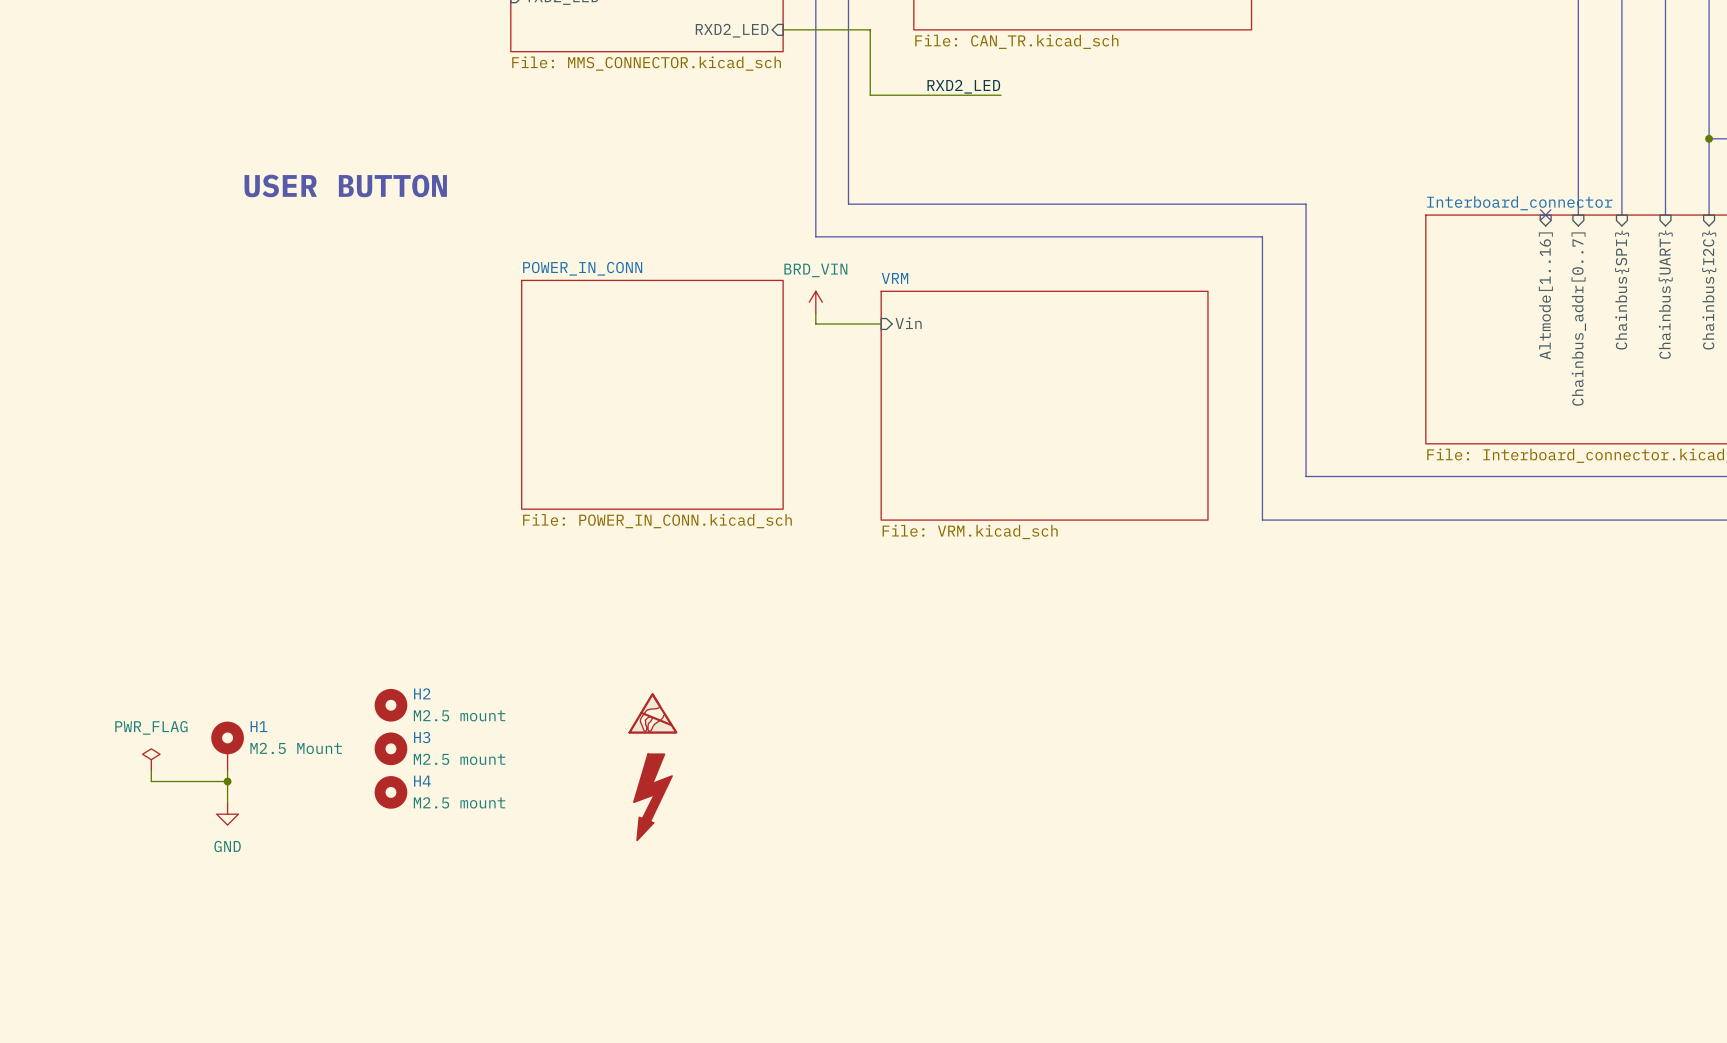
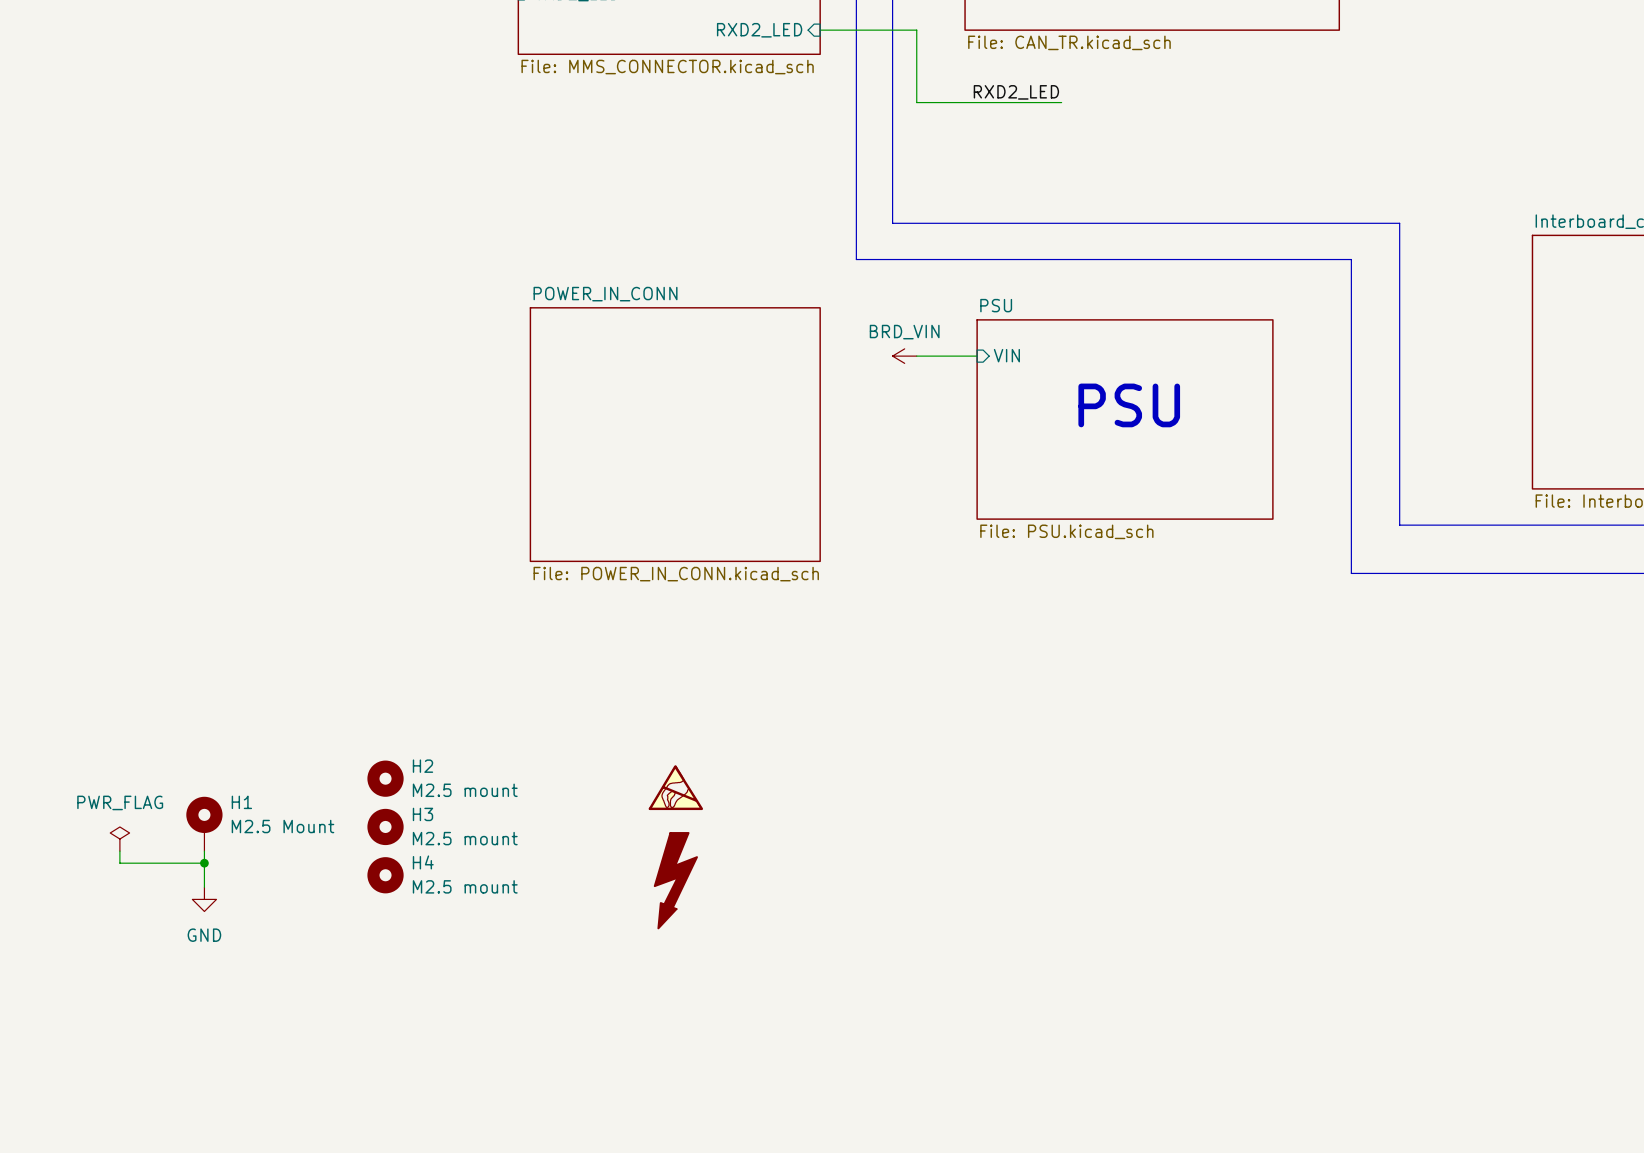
text: USER BUTTON (345, 185) -> none
power symbol rotation: 0° (815, 302) -> 90° counterclockwise (904, 356)
power symbol position: BRD_VIN (815, 302) -> BRD_VIN (904, 356)
wire: (815, 313) (815, 323) (870, 323) -> none
wire: none -> (928, 356) (977, 356)
sheet pin: Vin (908, 323) -> none
sheet pin: none -> VIN (1006, 355)
text: none -> PSU (1129, 405)
sheet PSU: none -> File: PSU.kicad_sch (1125, 419)
sheet VRM: File: VRM.kicad_sch (1044, 405) -> none

